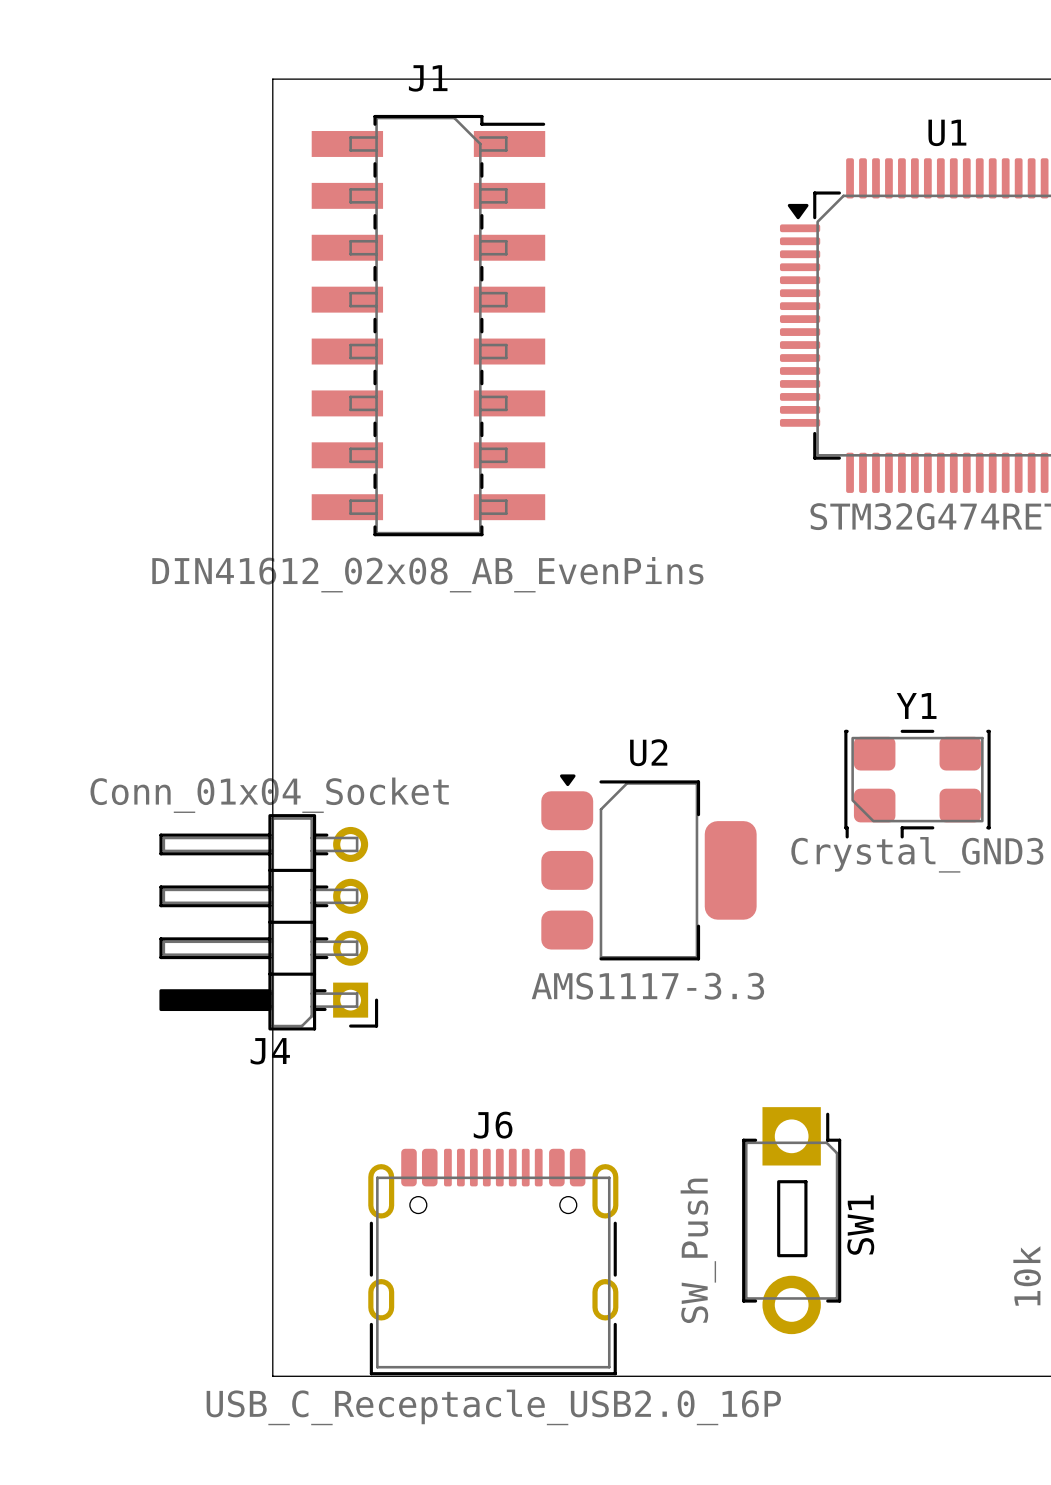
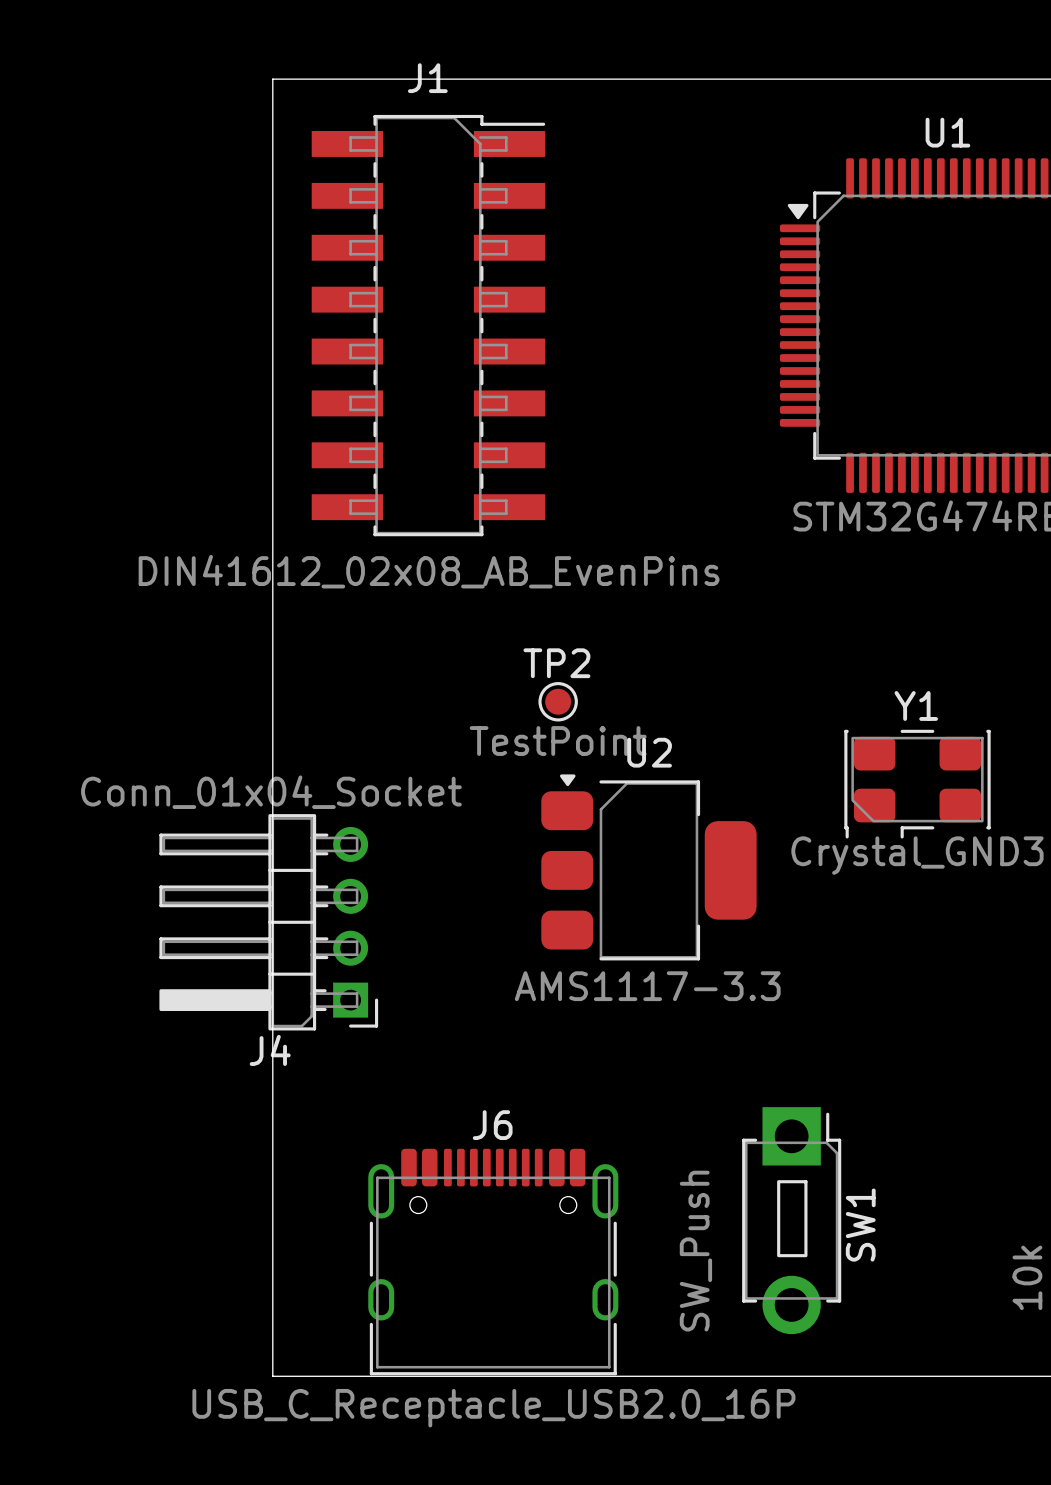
TP2: none -> TestPoint (558, 701)

